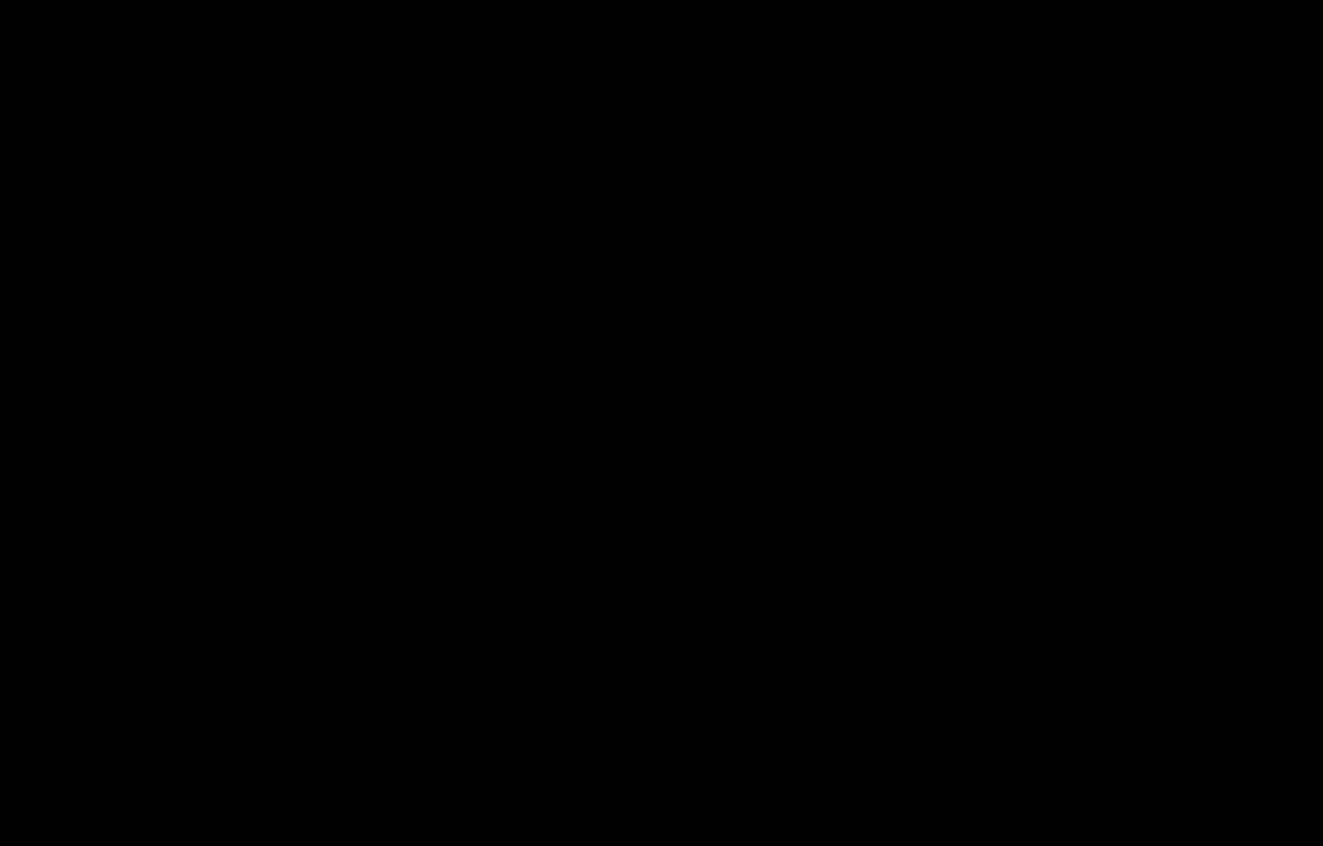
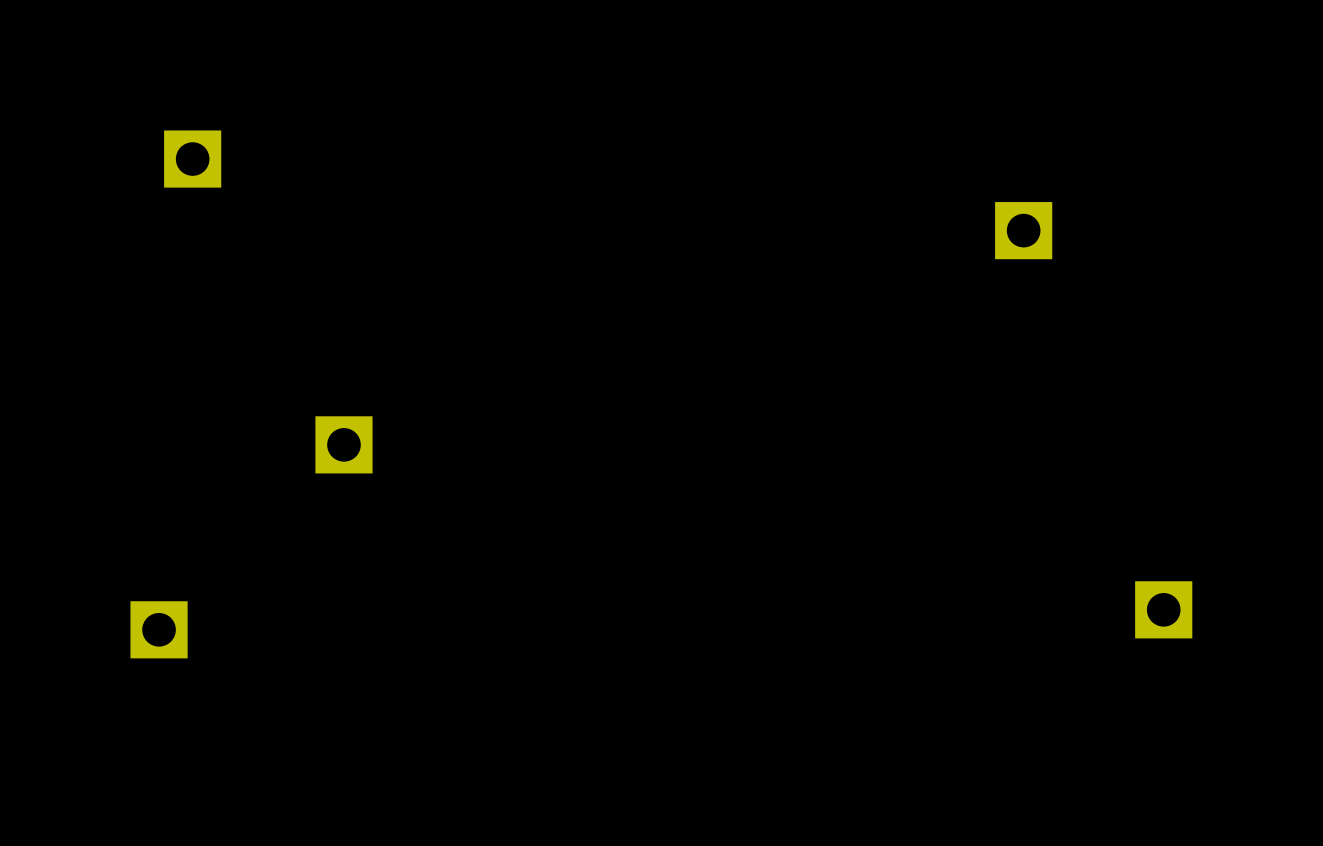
part: none -> (192, 159)
part: none -> (1023, 230)
part: none -> (343, 444)
part: none -> (1163, 609)
part: none -> (159, 629)

